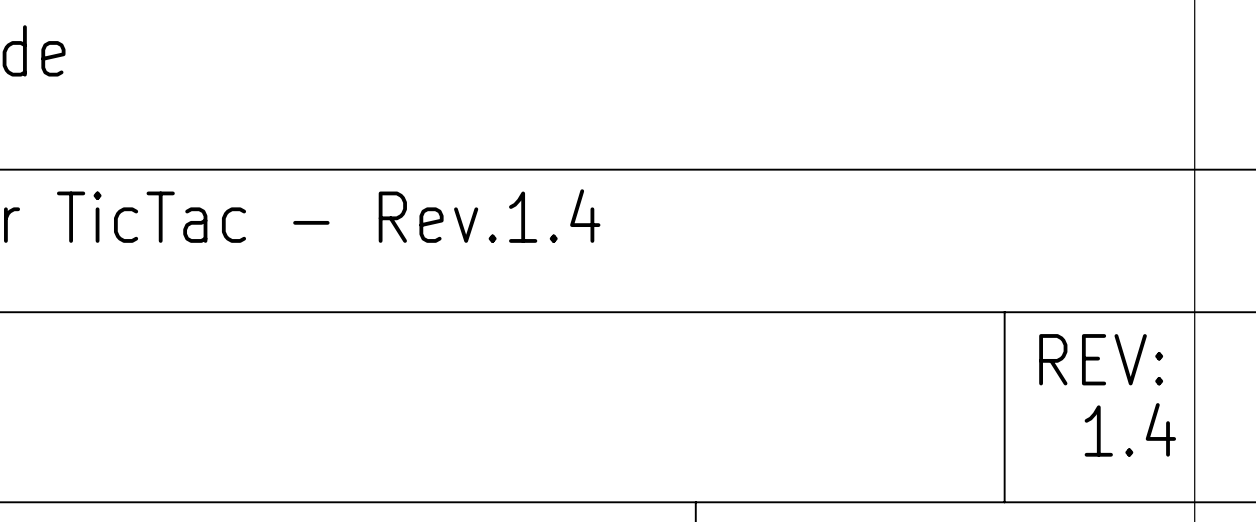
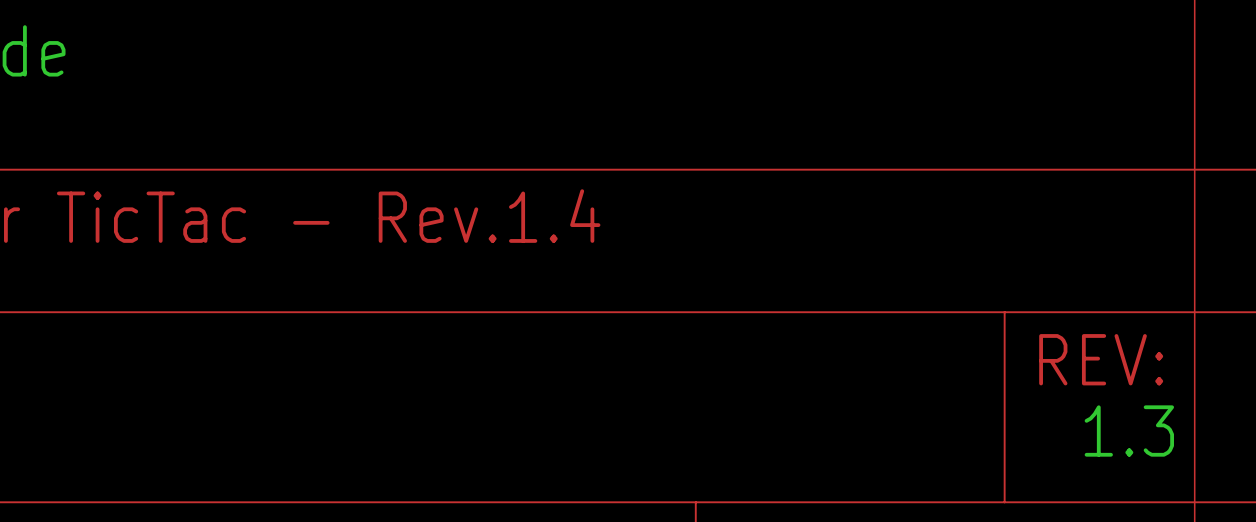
text: 1.4 (1130, 429) -> 1.3 (1129, 431)

